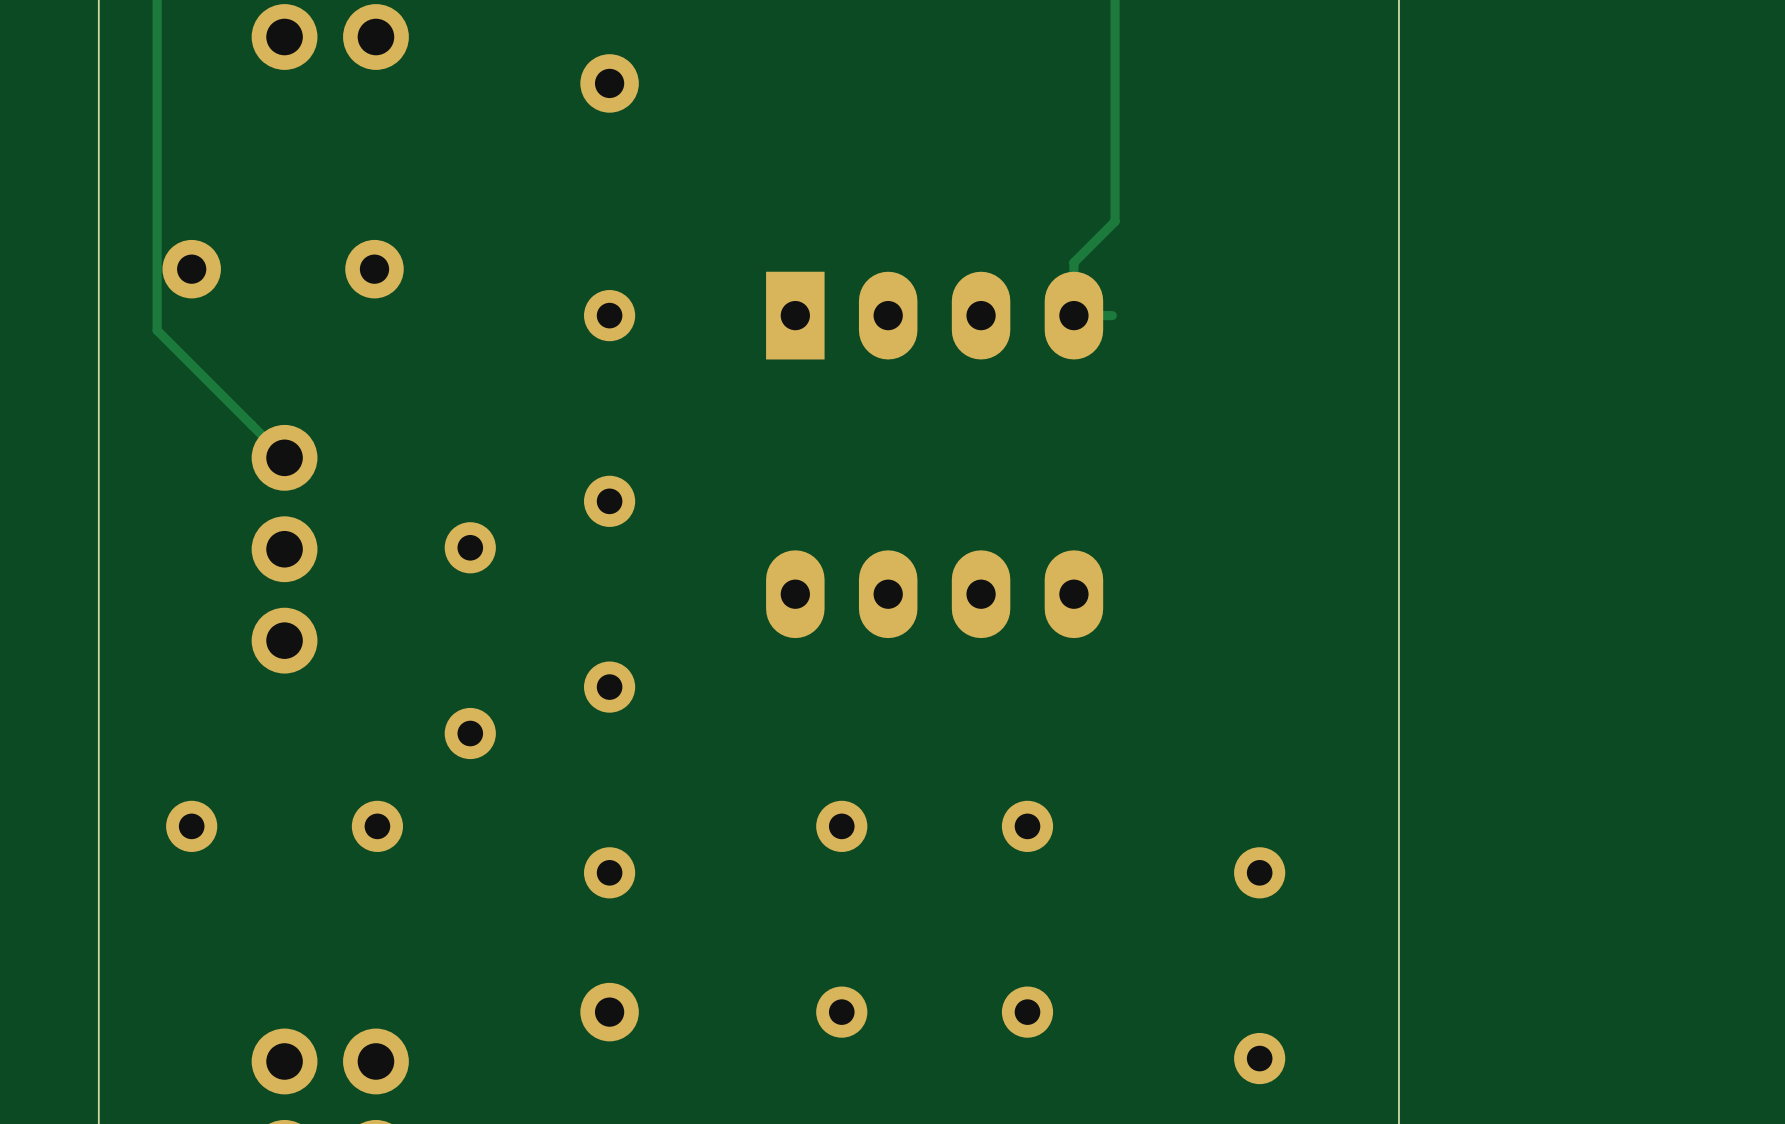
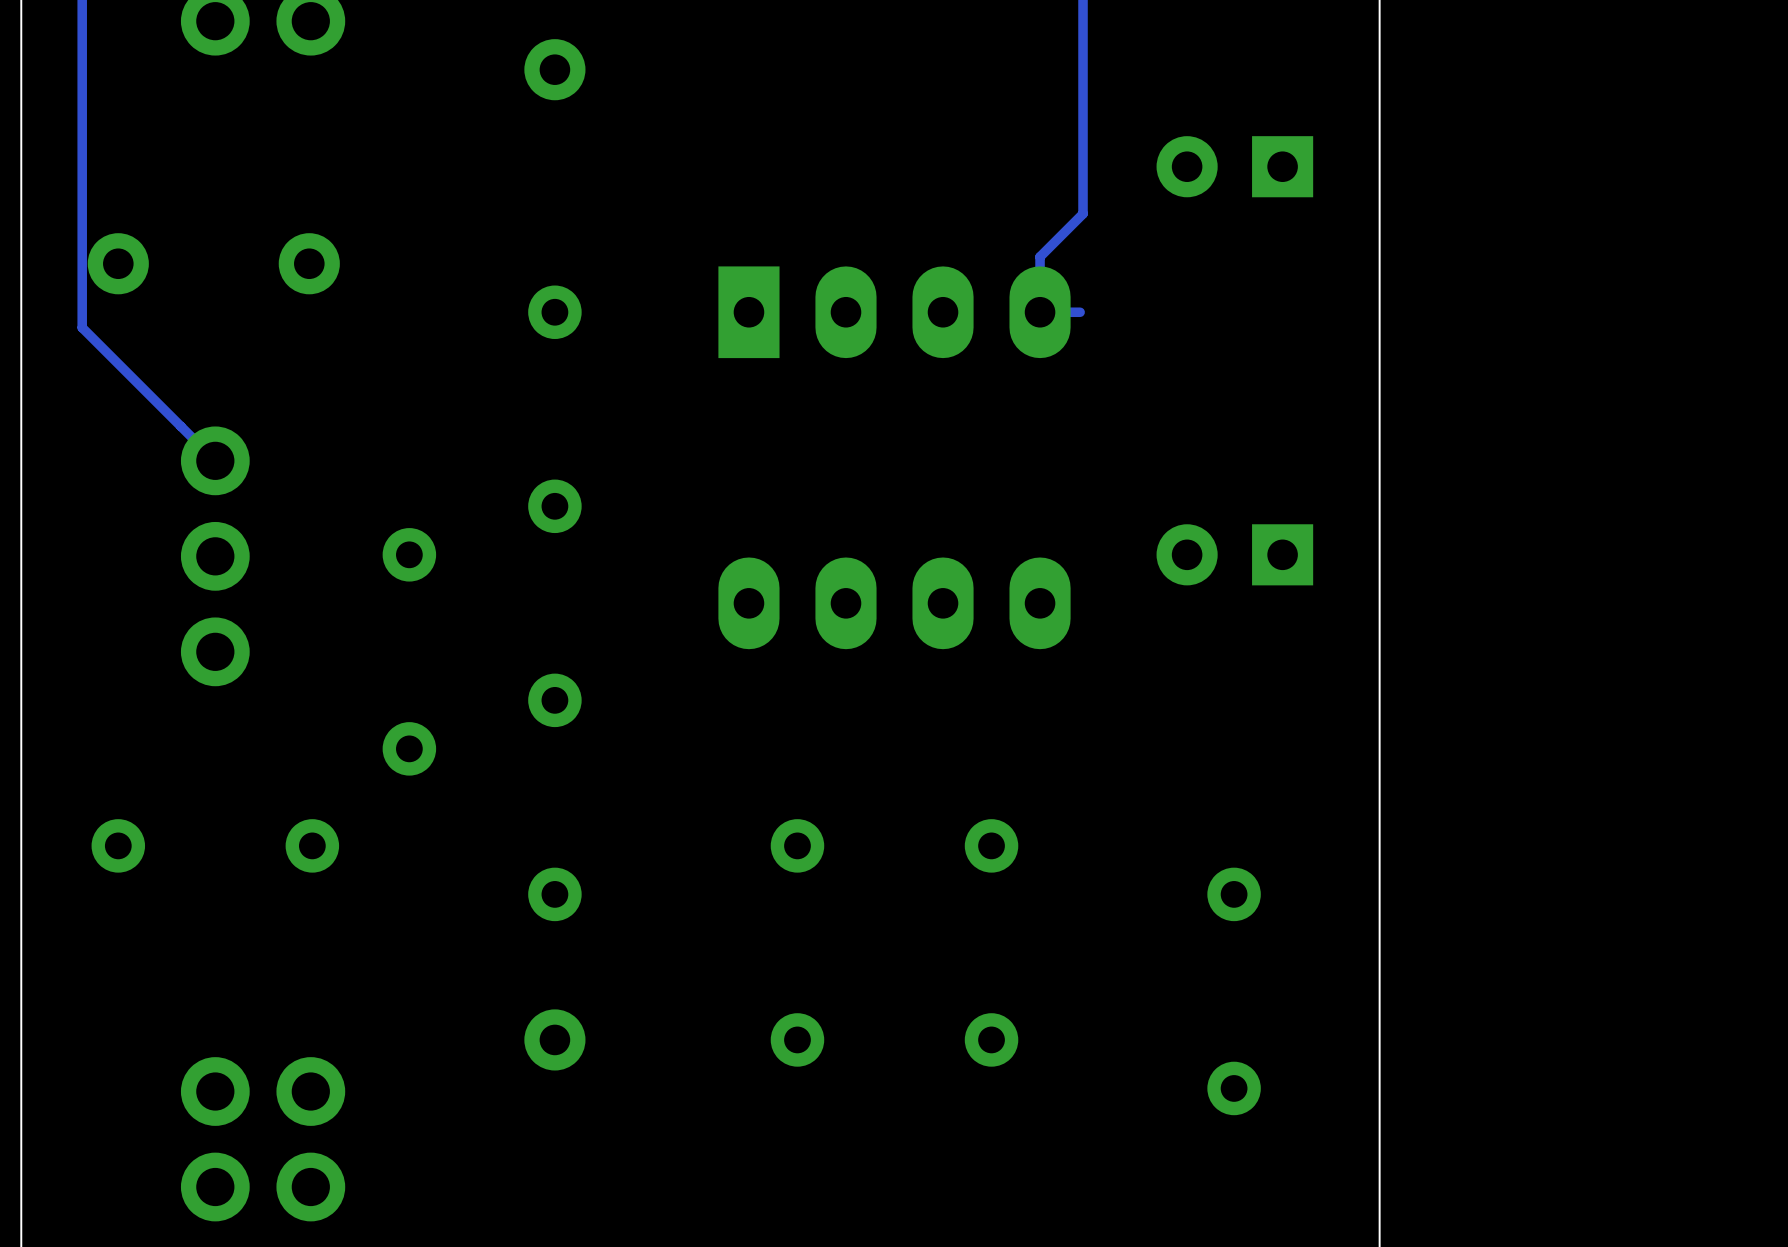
part: none -> (1234, 166)
part: none -> (1234, 554)

